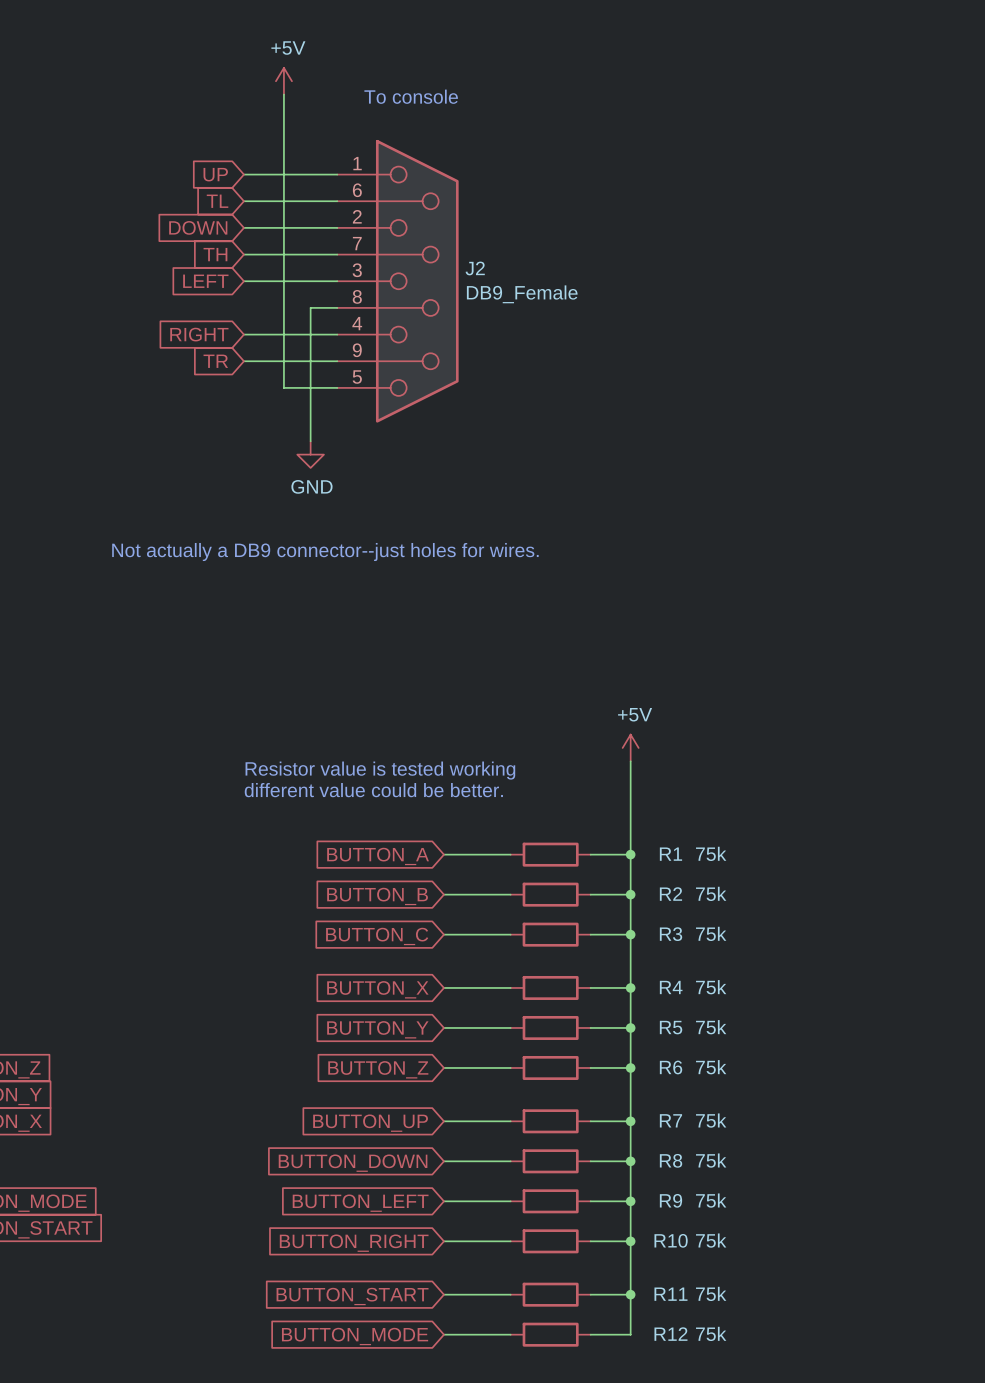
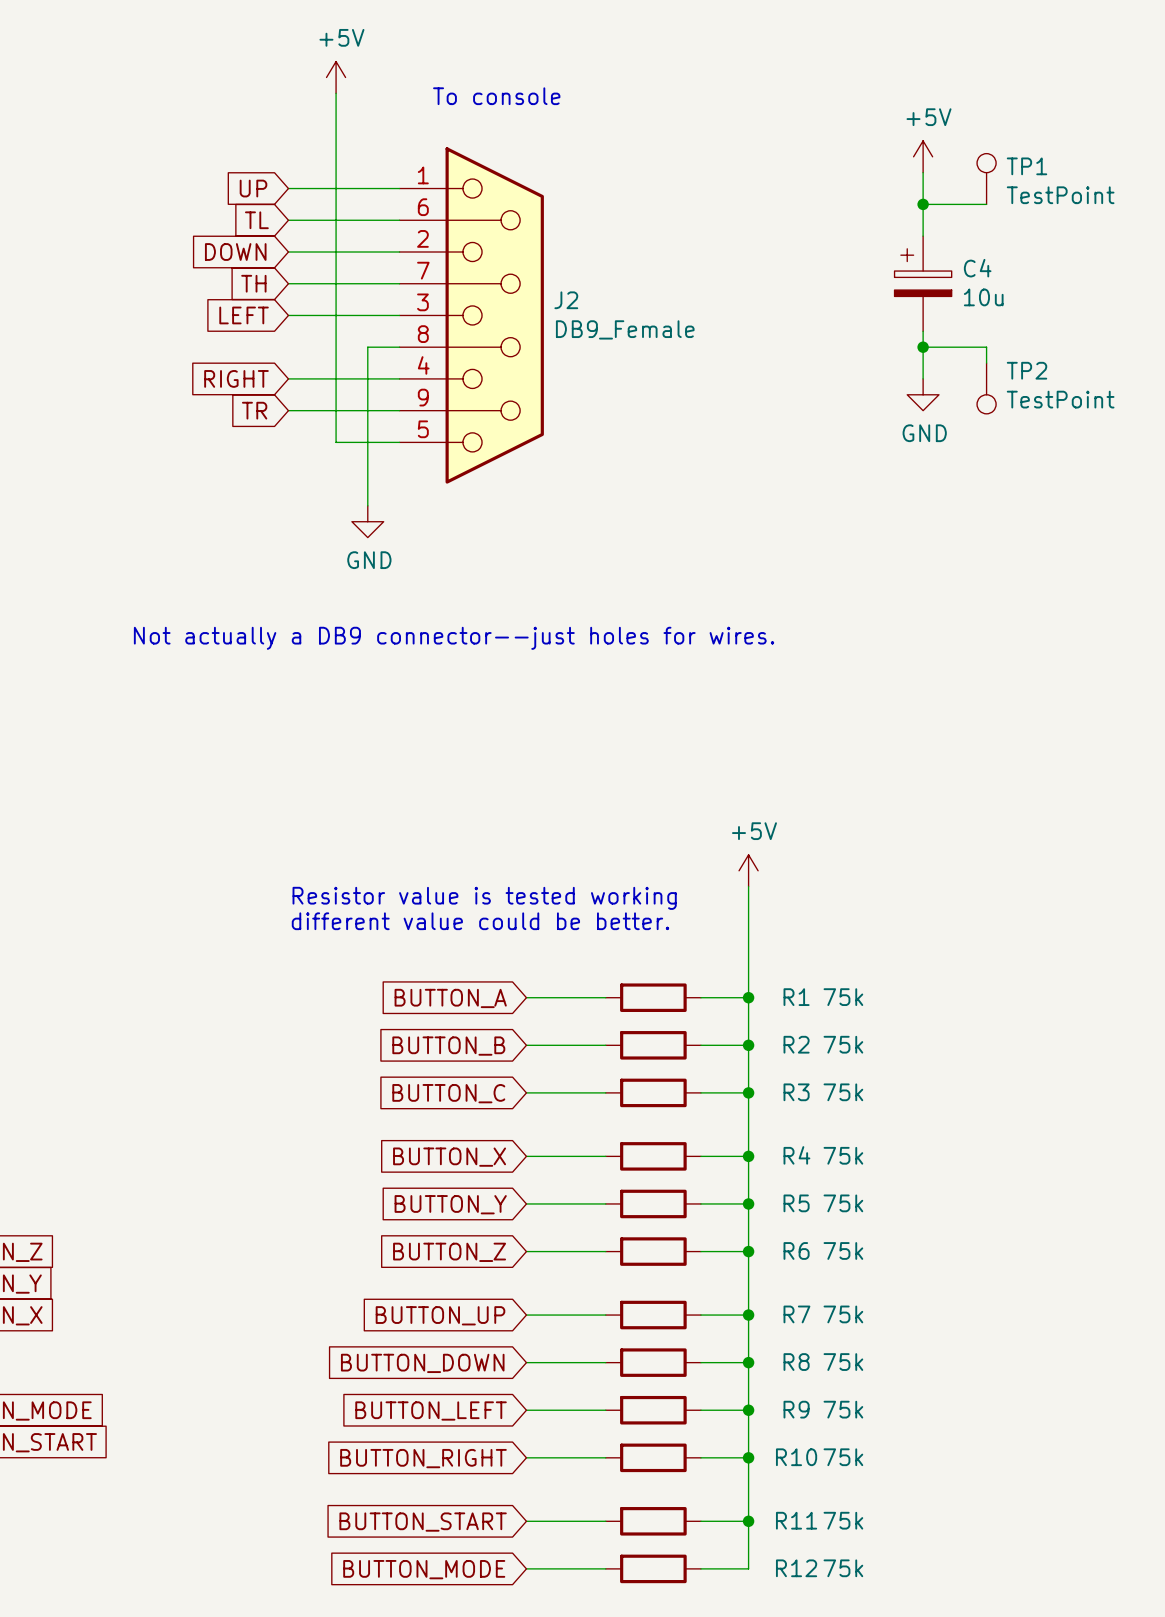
power symbol: none -> +5V (923, 156)
wire: none -> (923, 172) (923, 236)
TP1: none -> TestPoint (986, 179)
wire: none -> (923, 204) (986, 204)
junction: none -> (923, 204)
C4: none -> 10u (923, 283)
wire: none -> (923, 331) (923, 378)
wire: none -> (923, 347) (986, 347) (986, 363)
junction: none -> (923, 347)
TP2: none -> TestPoint (986, 388)
power symbol: none -> GND (923, 394)

